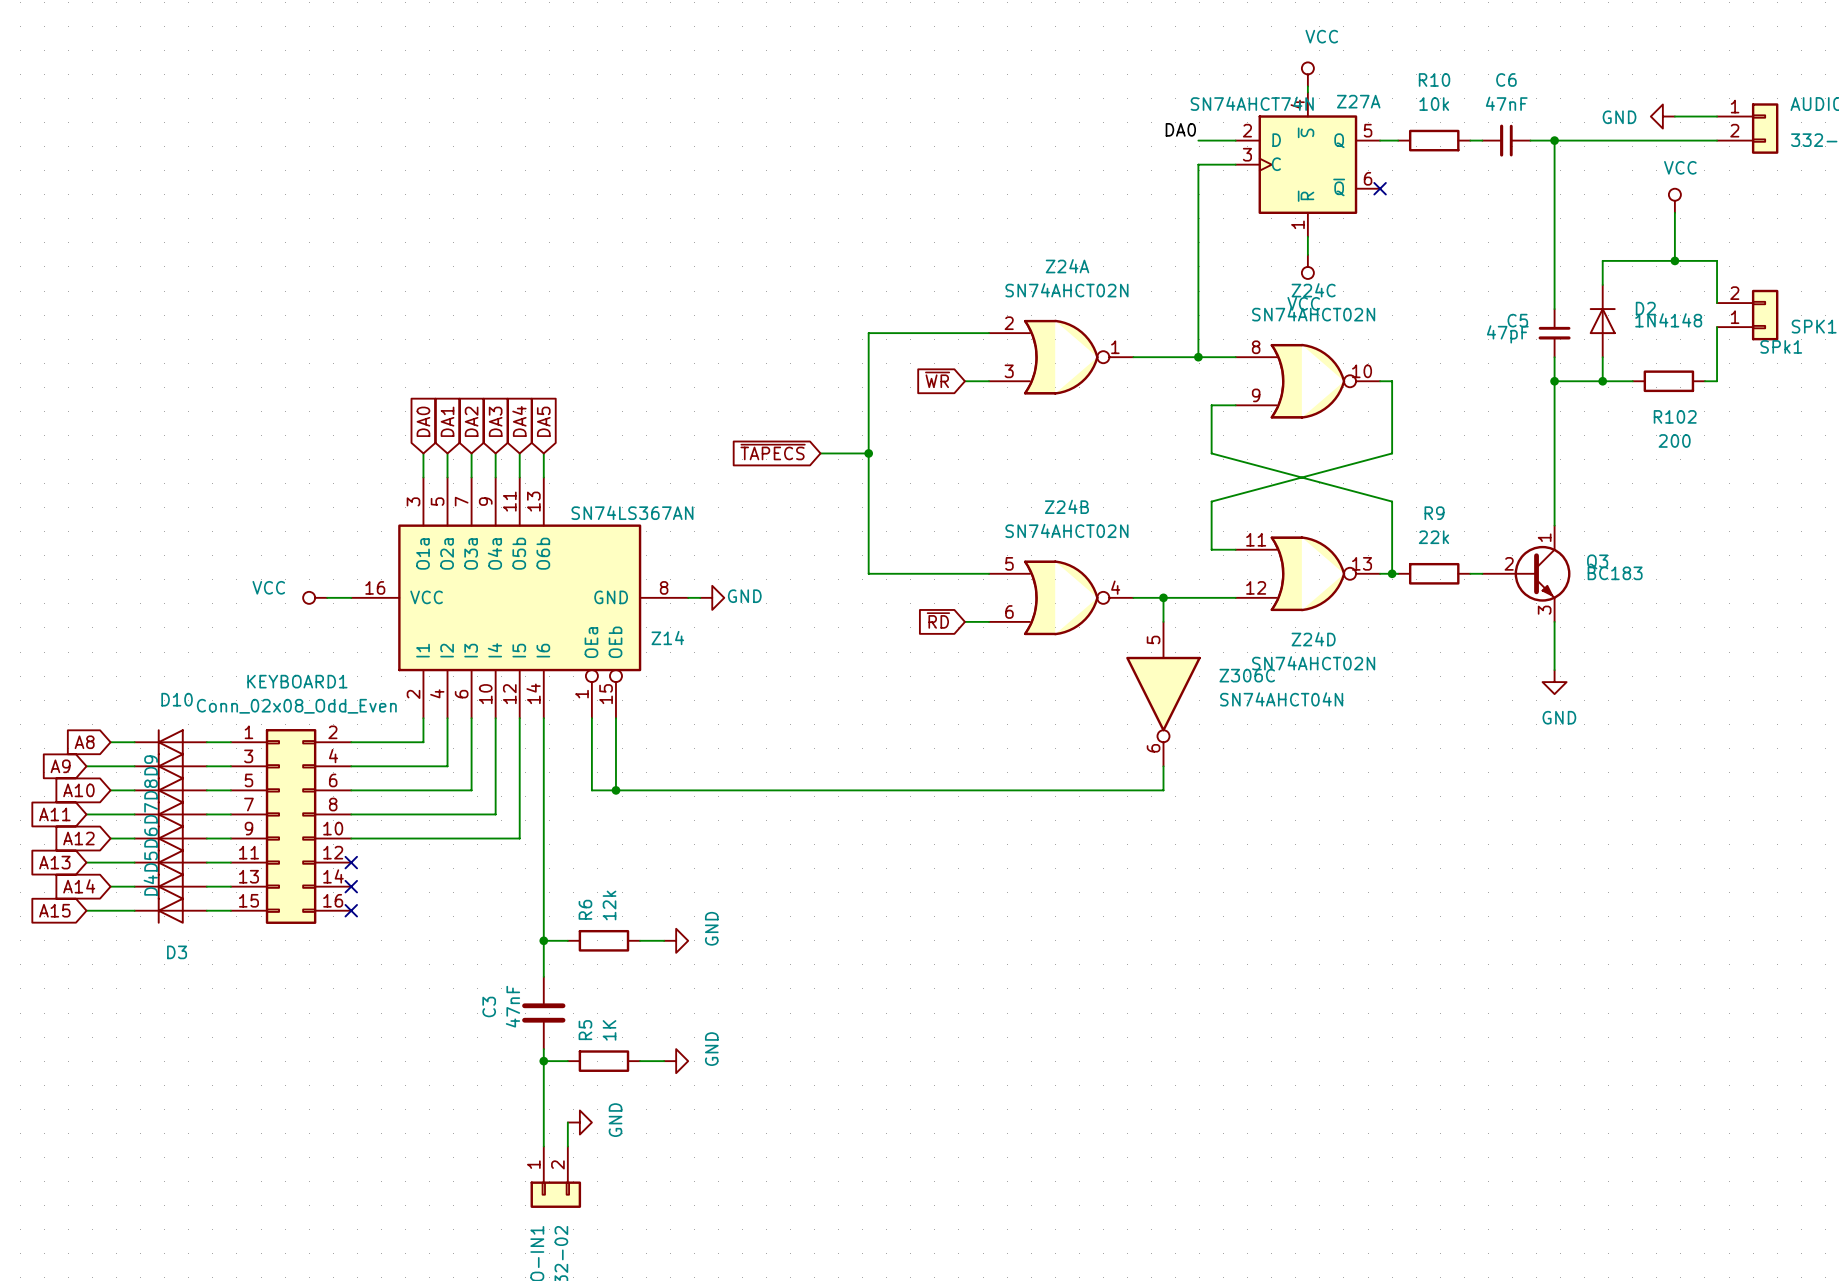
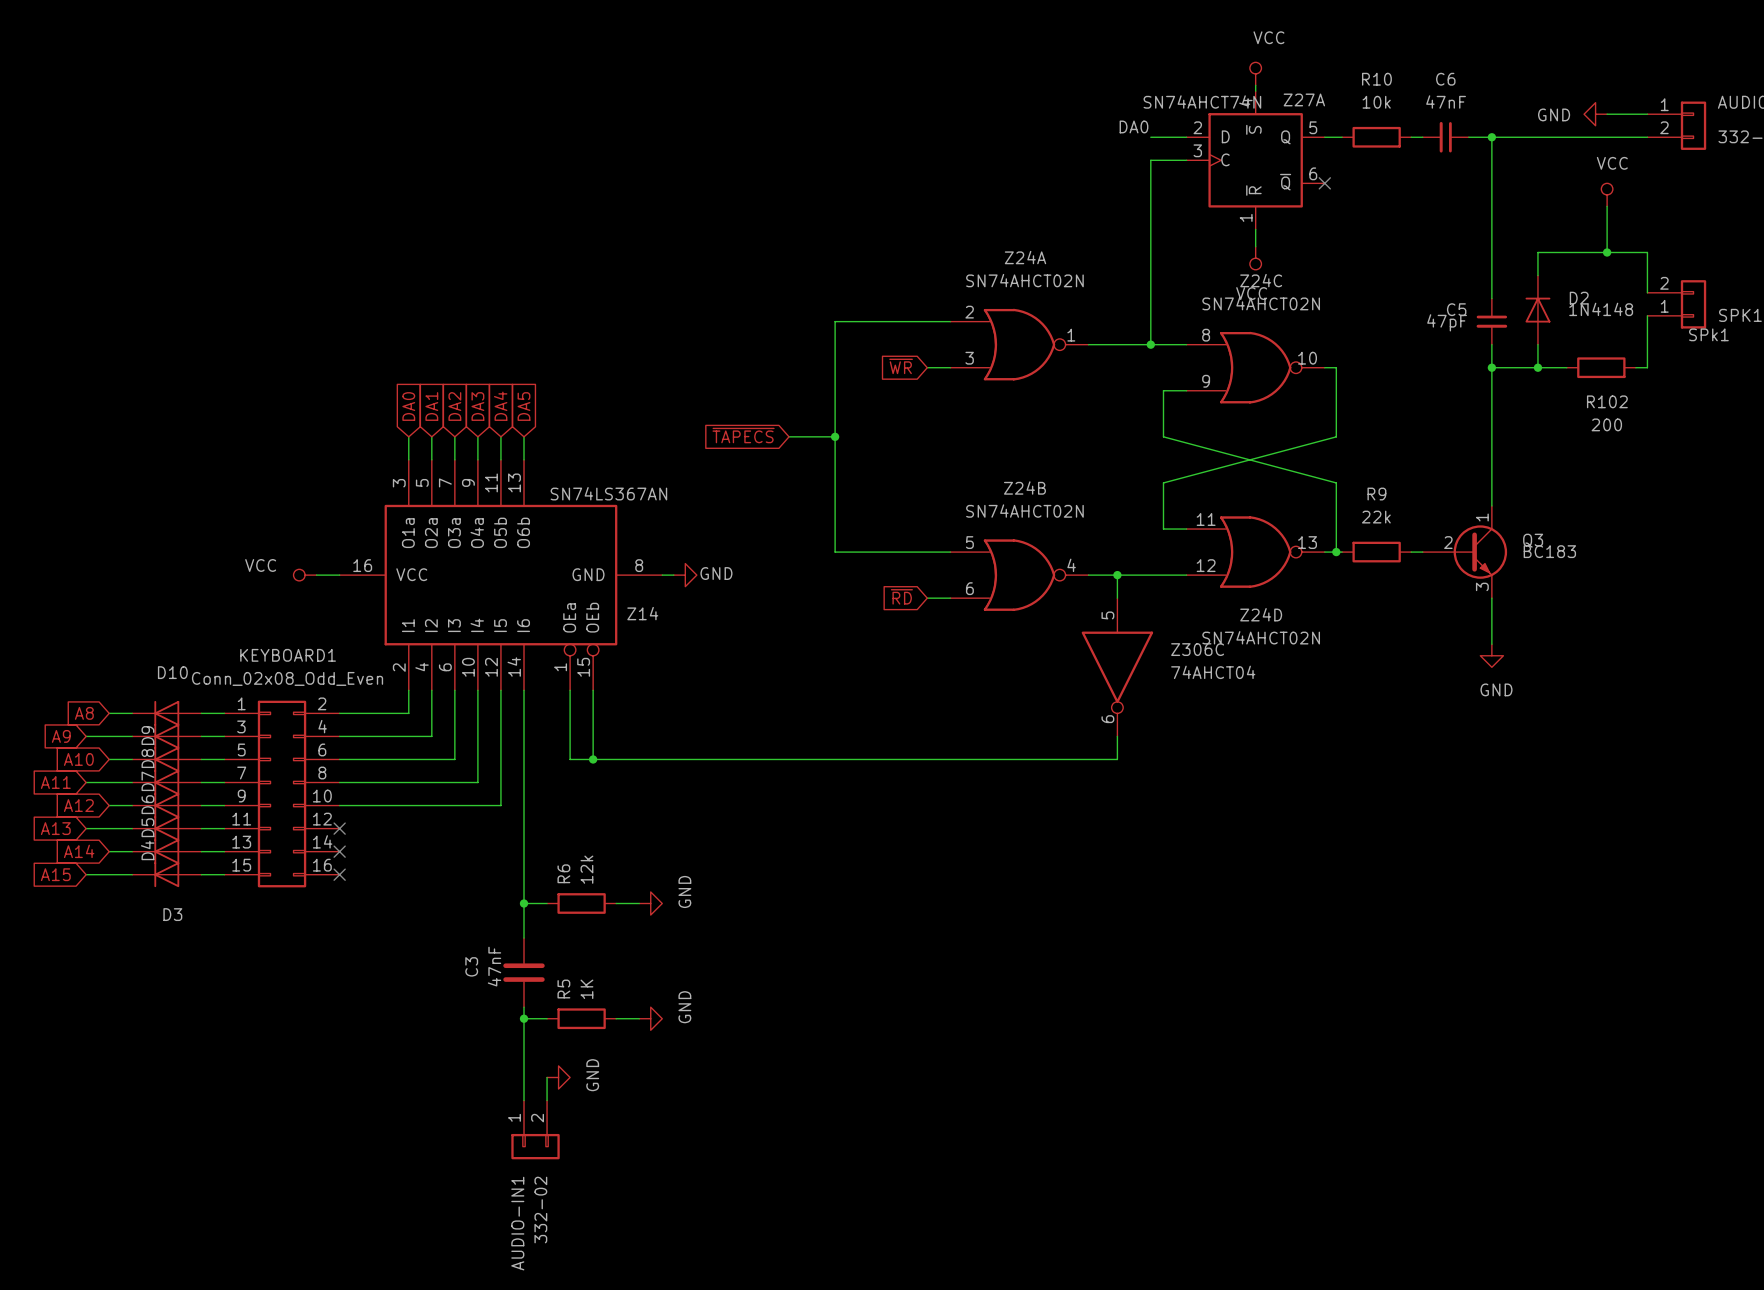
Z306C value: SN74AHCT04N (1281, 699) -> 74AHCT04 (1213, 672)

